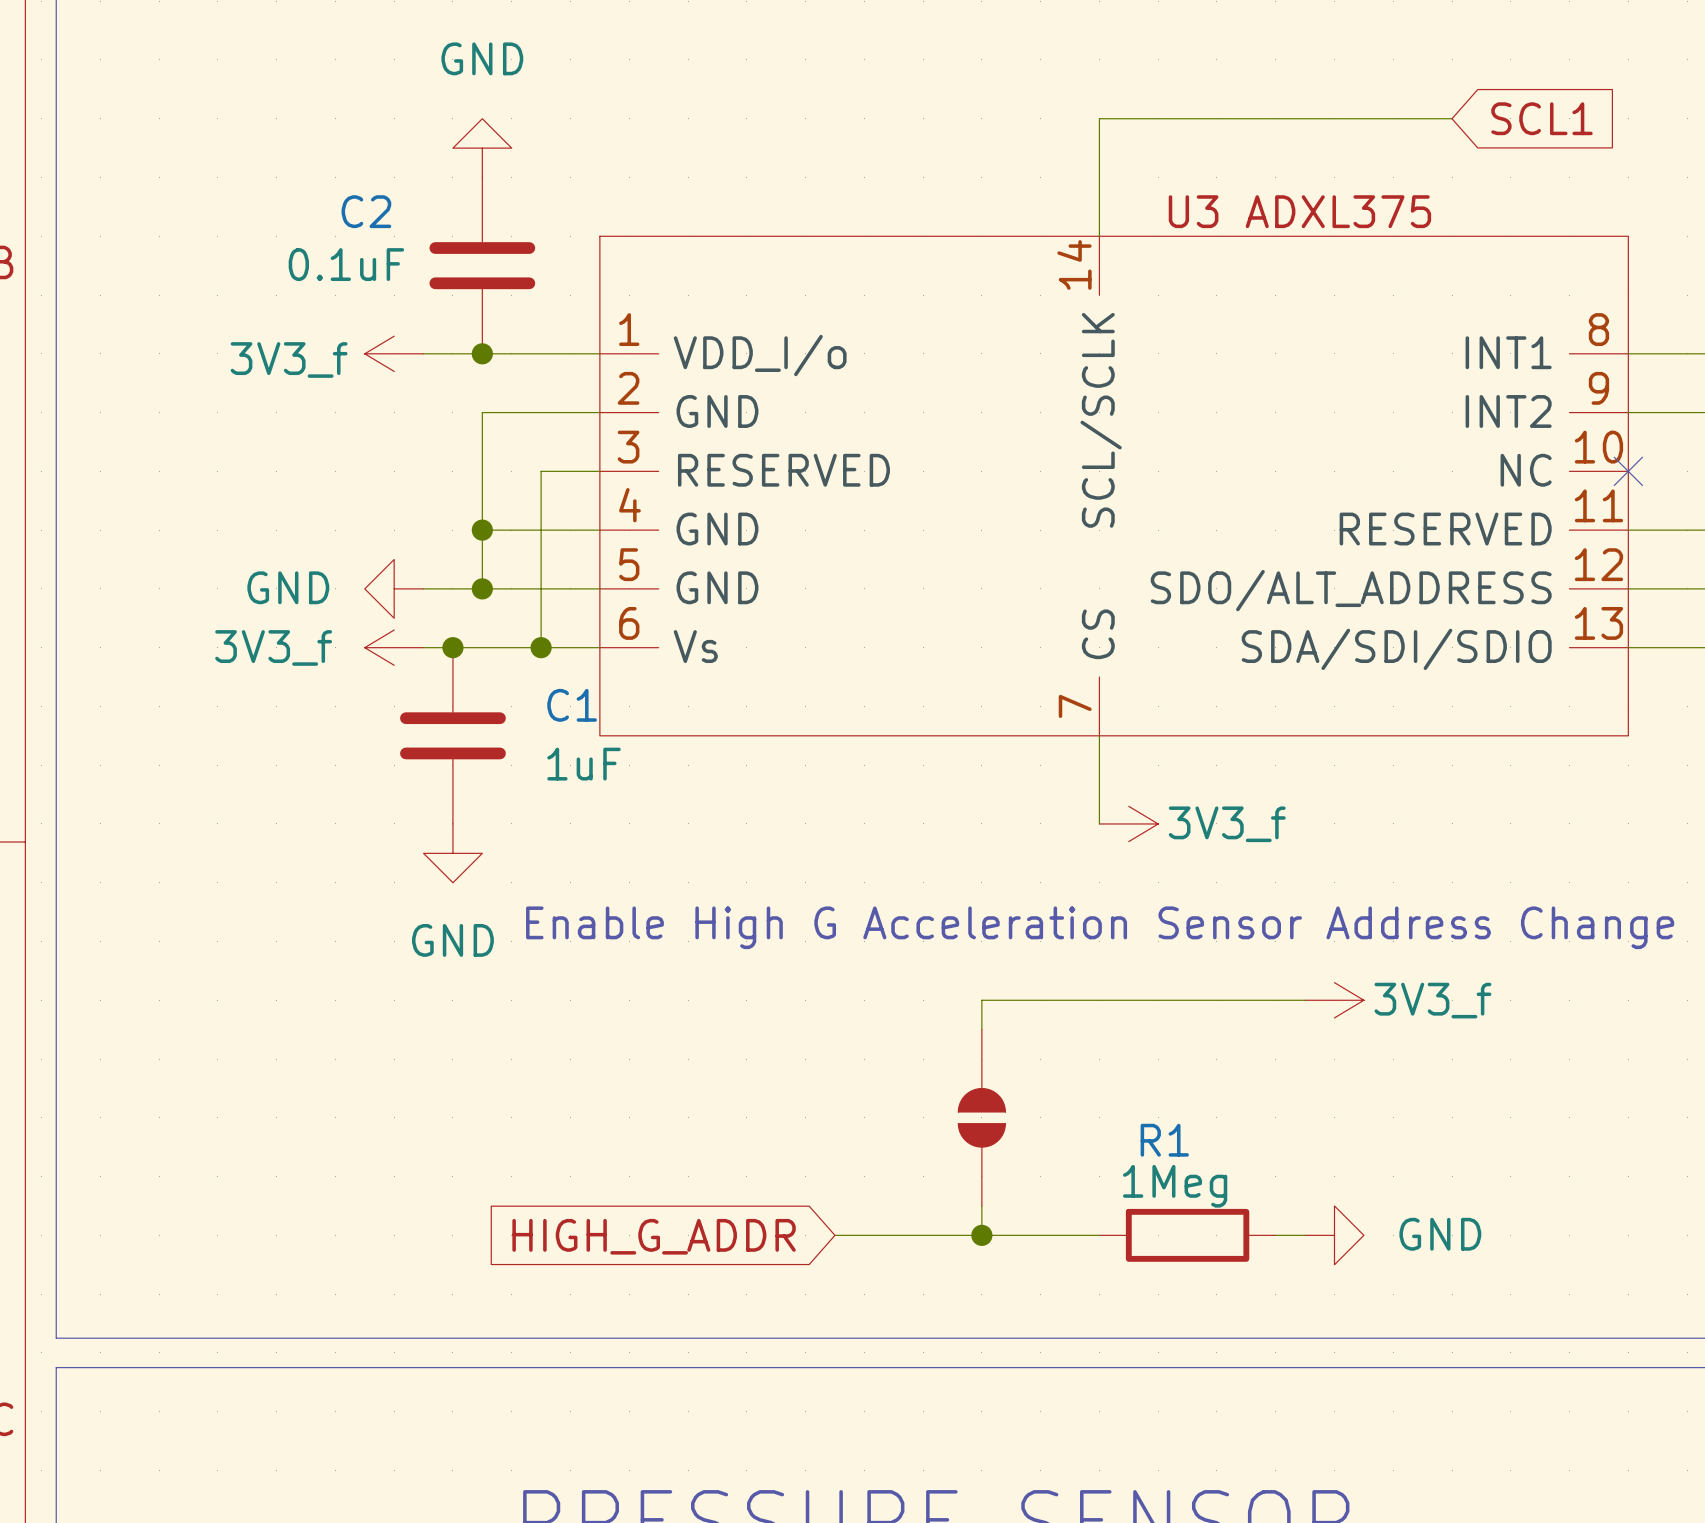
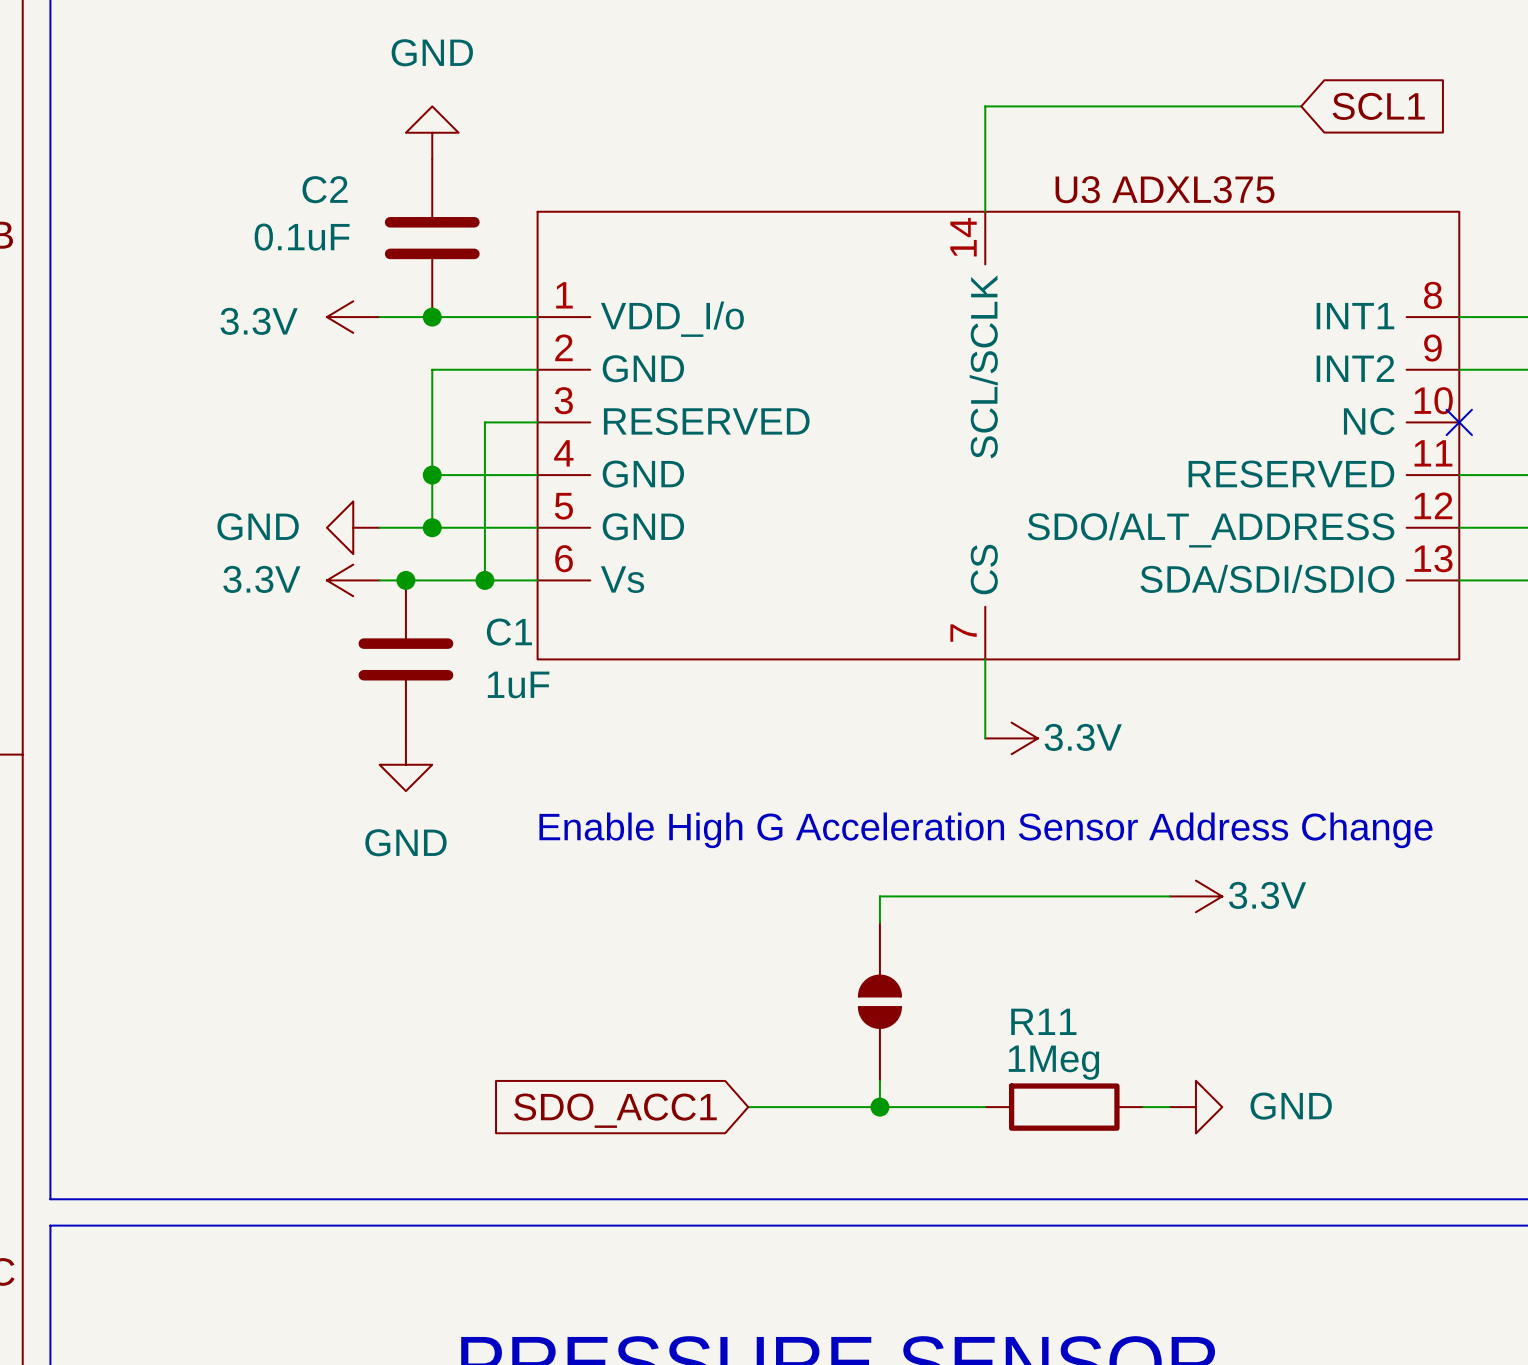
power symbol: 3V3_f (394, 353) -> 3.3V (353, 317)
power symbol: 3V3_f (394, 647) -> 3.3V (353, 580)
power symbol: 3V3_f (1128, 823) -> 3.3V (1011, 738)
power symbol: 3V3_f (1334, 1000) -> 3.3V (1195, 896)
R1 name: R1 (1164, 1140) -> R11 (1043, 1021)
global label: HIGH_G_ADDR (654, 1236) -> SDO_ACC1 (615, 1110)

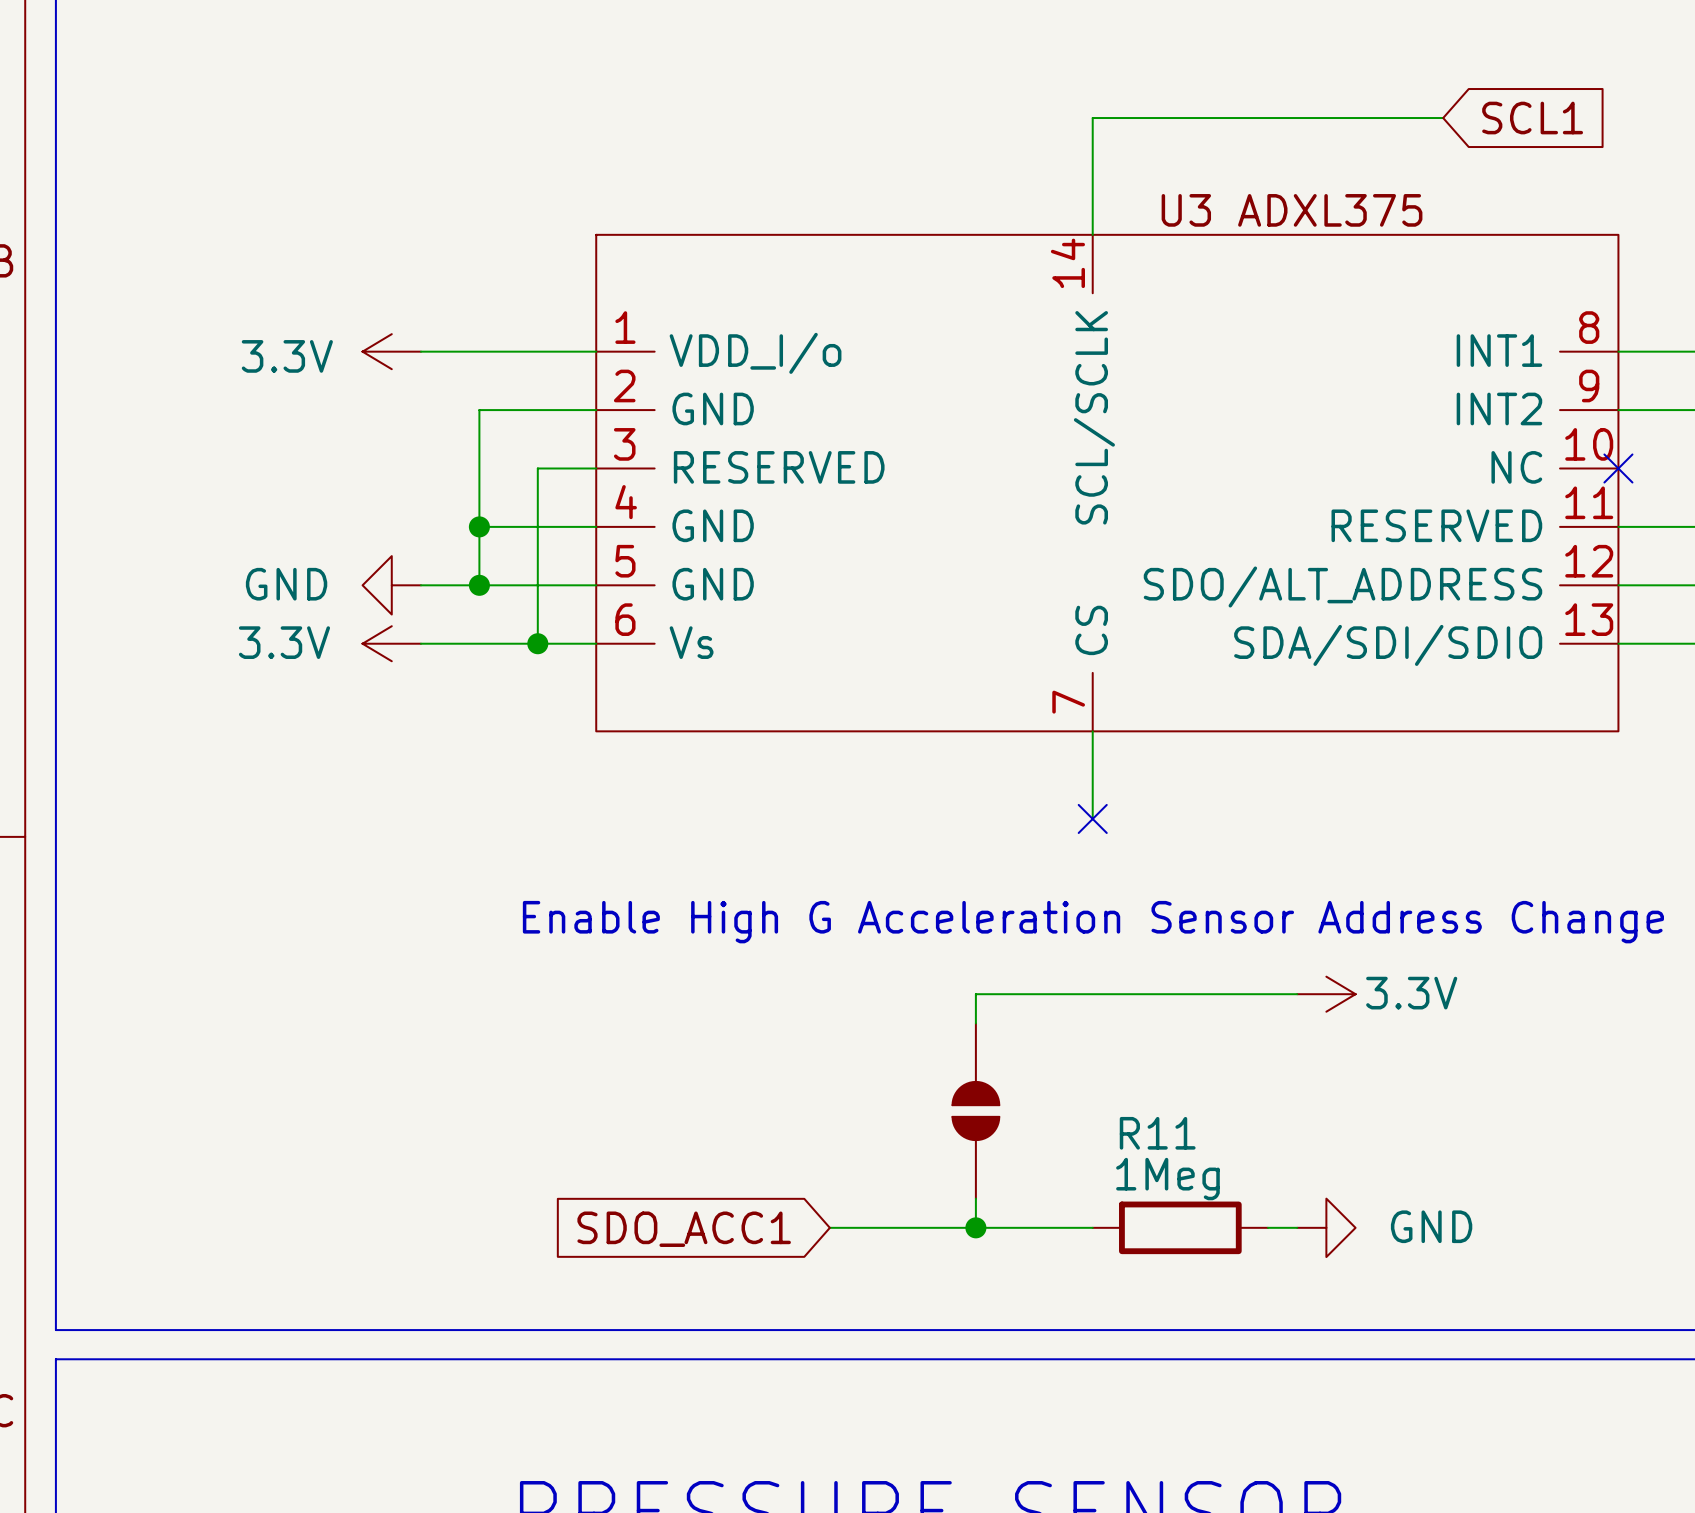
power symbol: GND (432, 132) -> none
C2: 0.1uF (432, 238) -> none
junction: (432, 317) -> none
junction: (405, 580) -> none
C1: 1uF (405, 659) -> none
no-connect mark: none -> (1092, 818)
power symbol: 3.3V (1011, 738) -> none
power symbol: GND (405, 764) -> none

